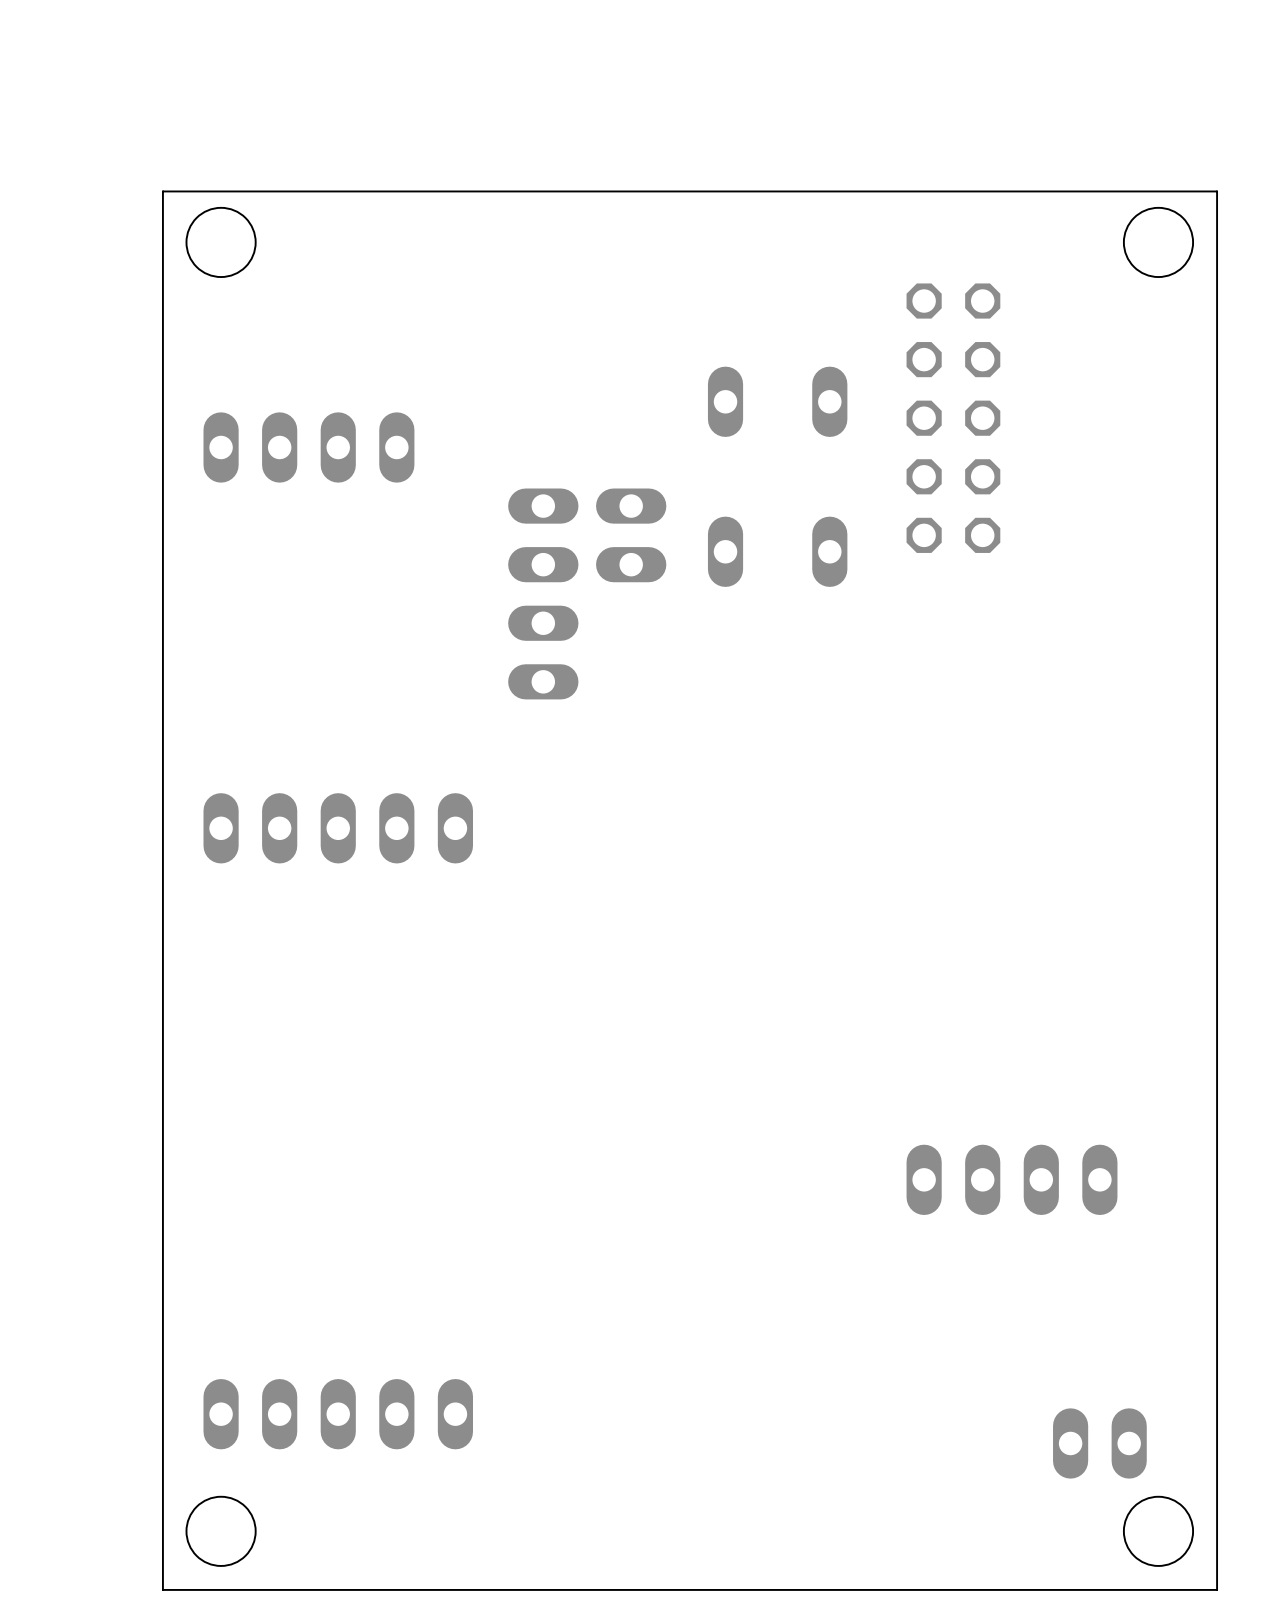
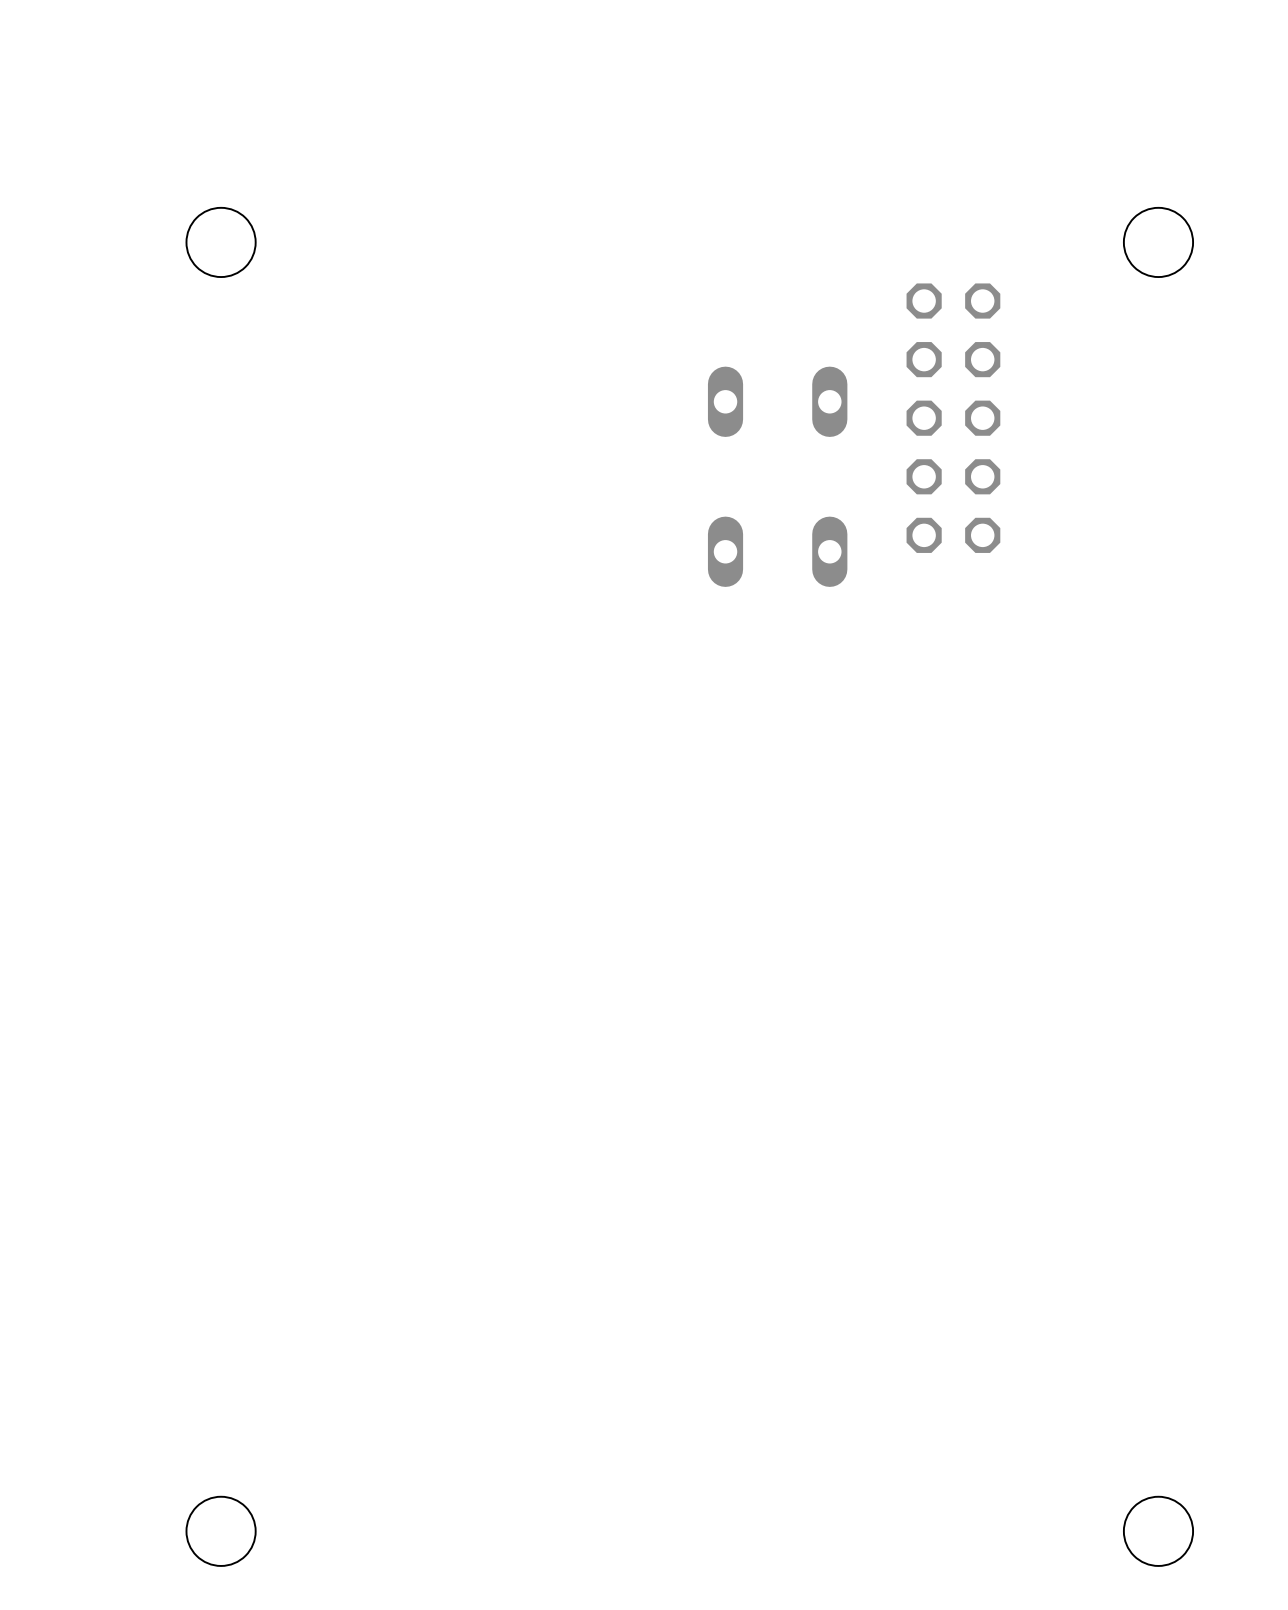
board edge: (1217, 191) (162, 191) (162, 1589) (1217, 1589) (1217, 191) -> none
part: (308, 447) -> none
part: (631, 535) -> none
part: (543, 593) -> none
part: (338, 828) -> none
part: (1012, 1179) -> none
part: (338, 1414) -> none
part: (1099, 1443) -> none

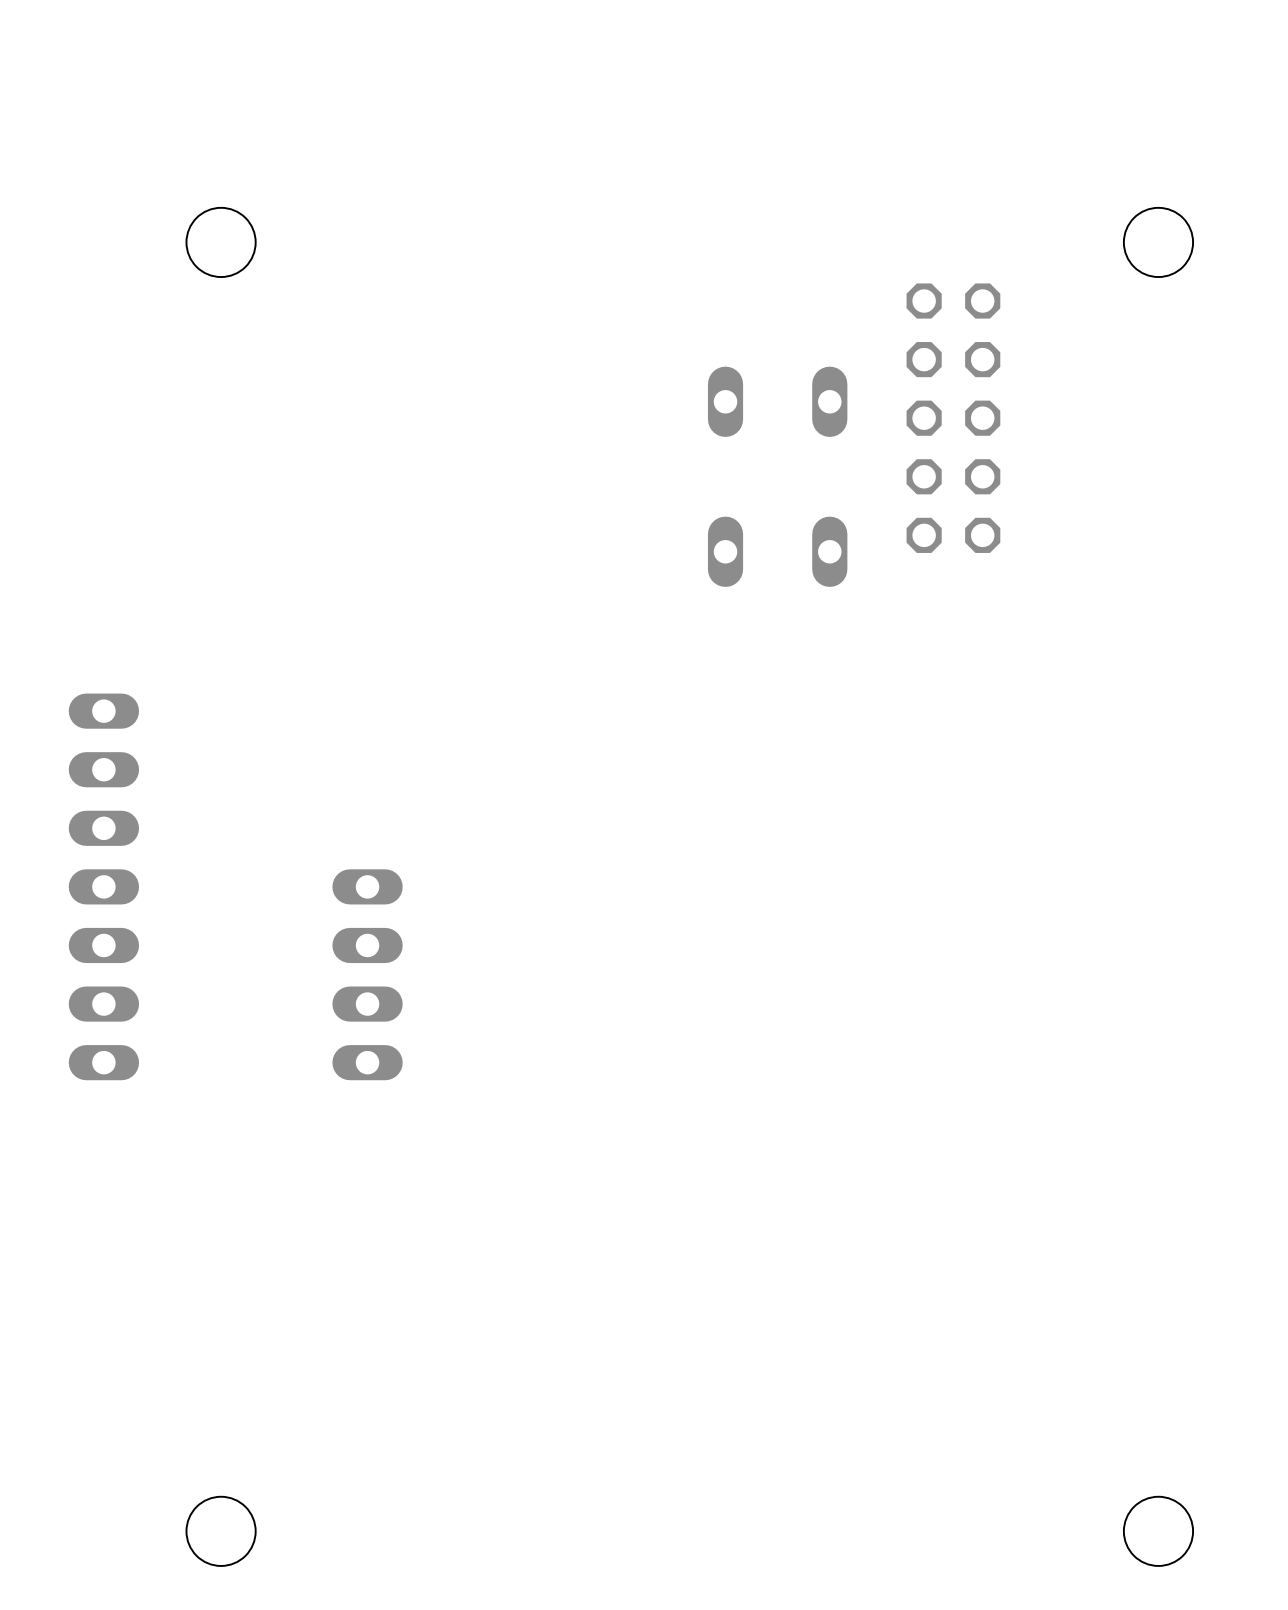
part: none -> (103, 886)
part: none -> (367, 974)

